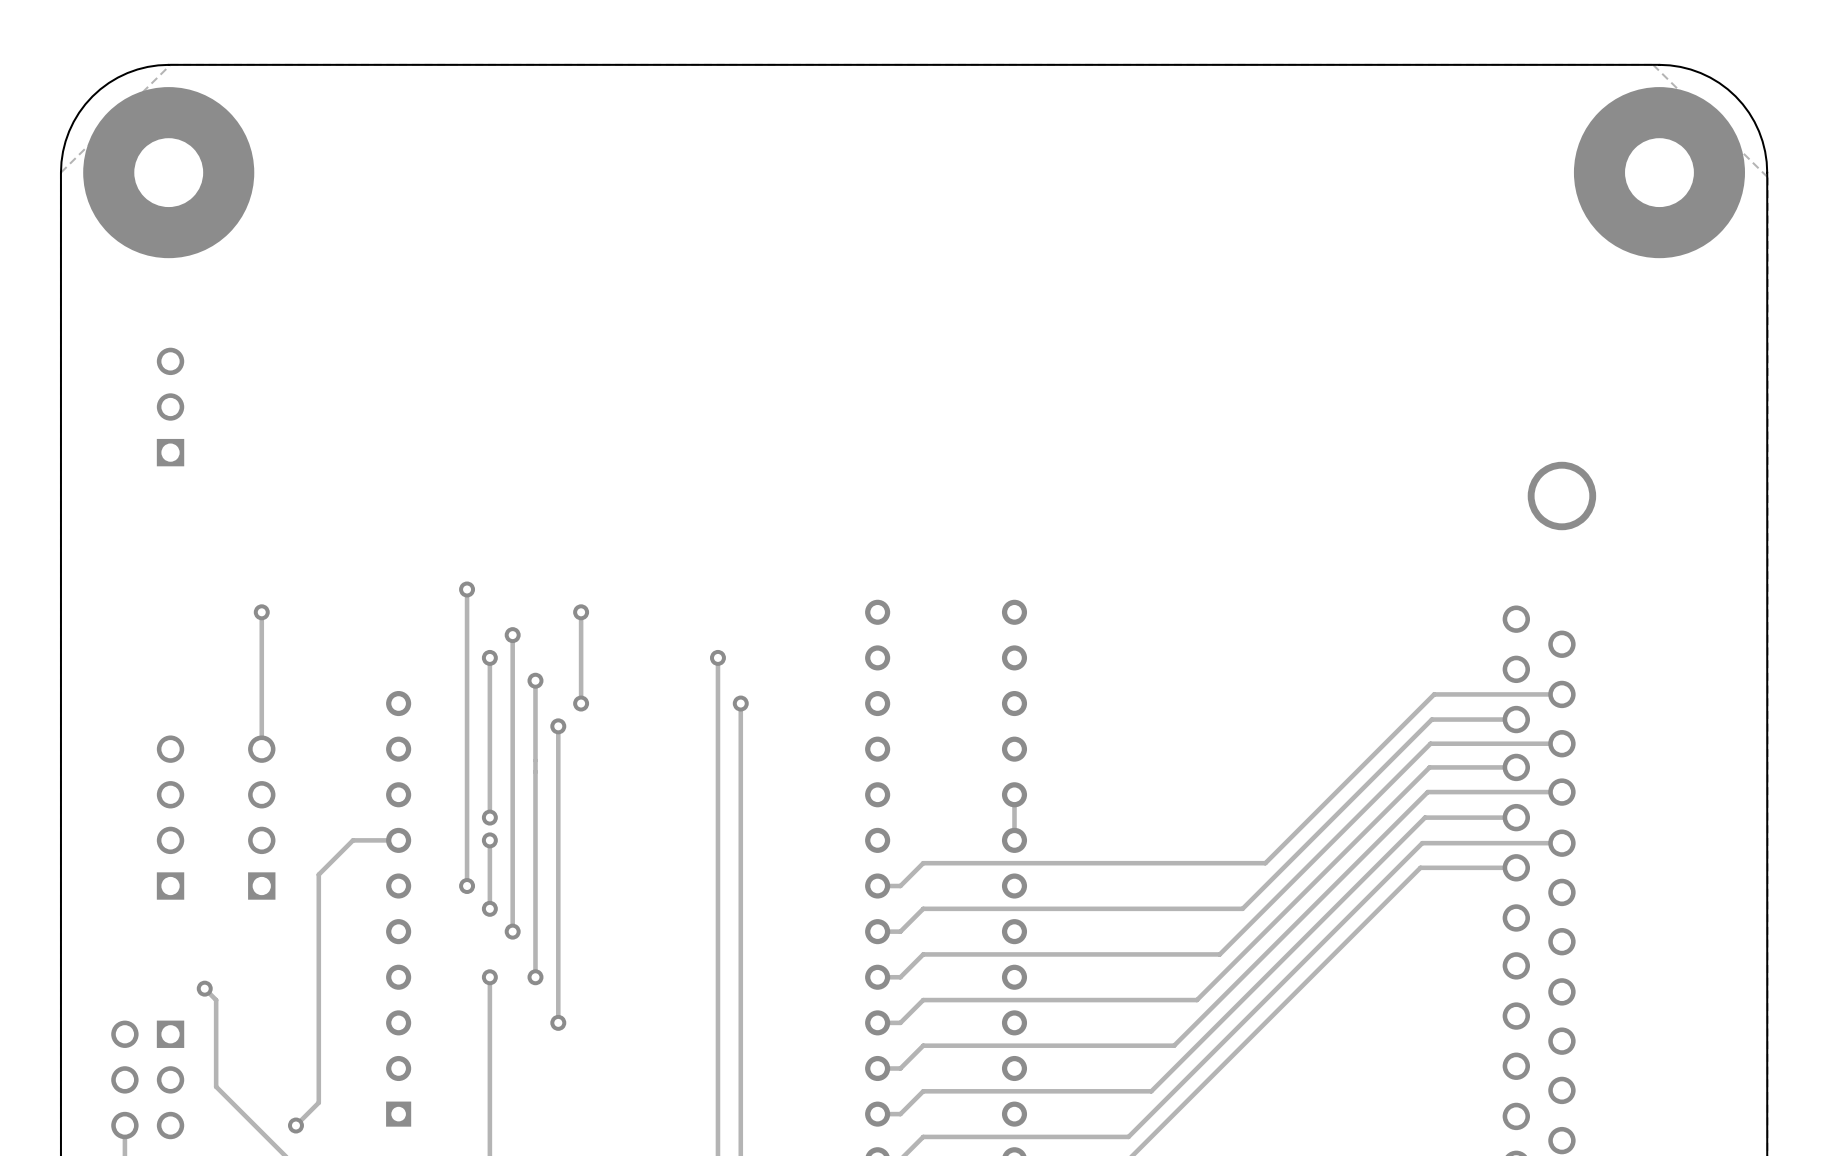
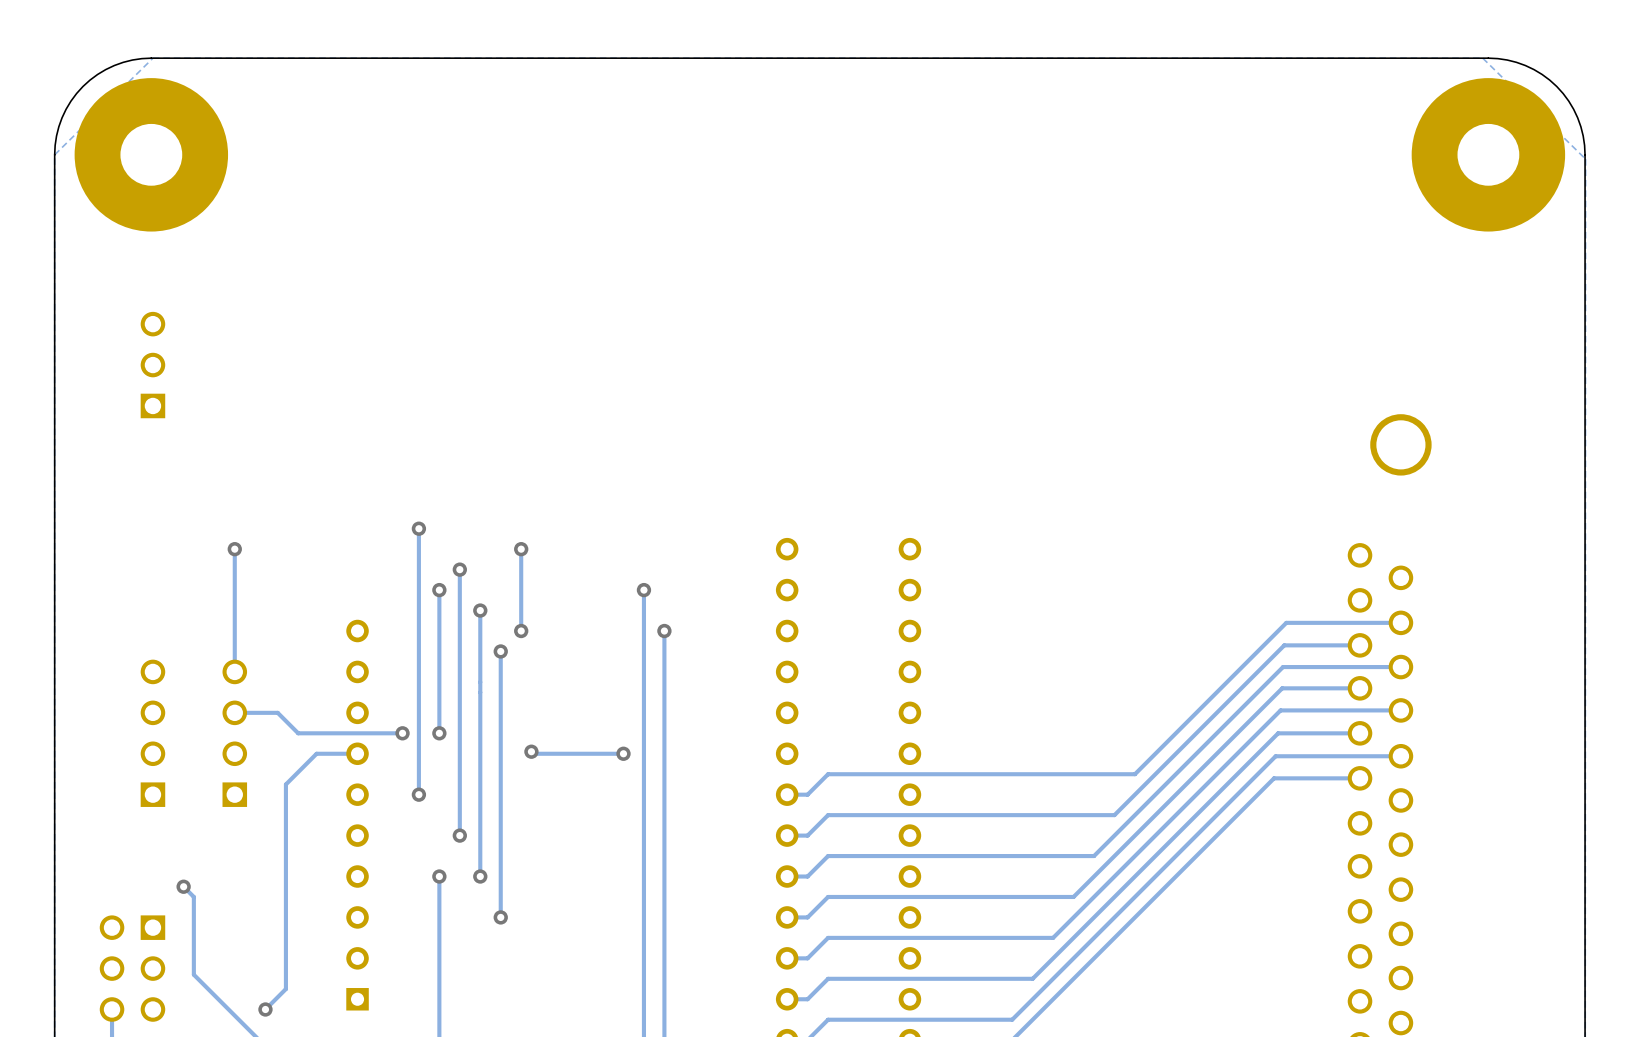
track: none -> (234, 712) (277, 712) (298, 733) (402, 733)
track: (1014, 794) (1014, 840) -> none
track: none -> (531, 751) (533, 753) (623, 753)
via: none -> (531, 751)
track: (489, 840) (489, 908) -> none
via position: (489, 840) -> (402, 733)
via: none -> (623, 753)
via: (489, 908) -> none

